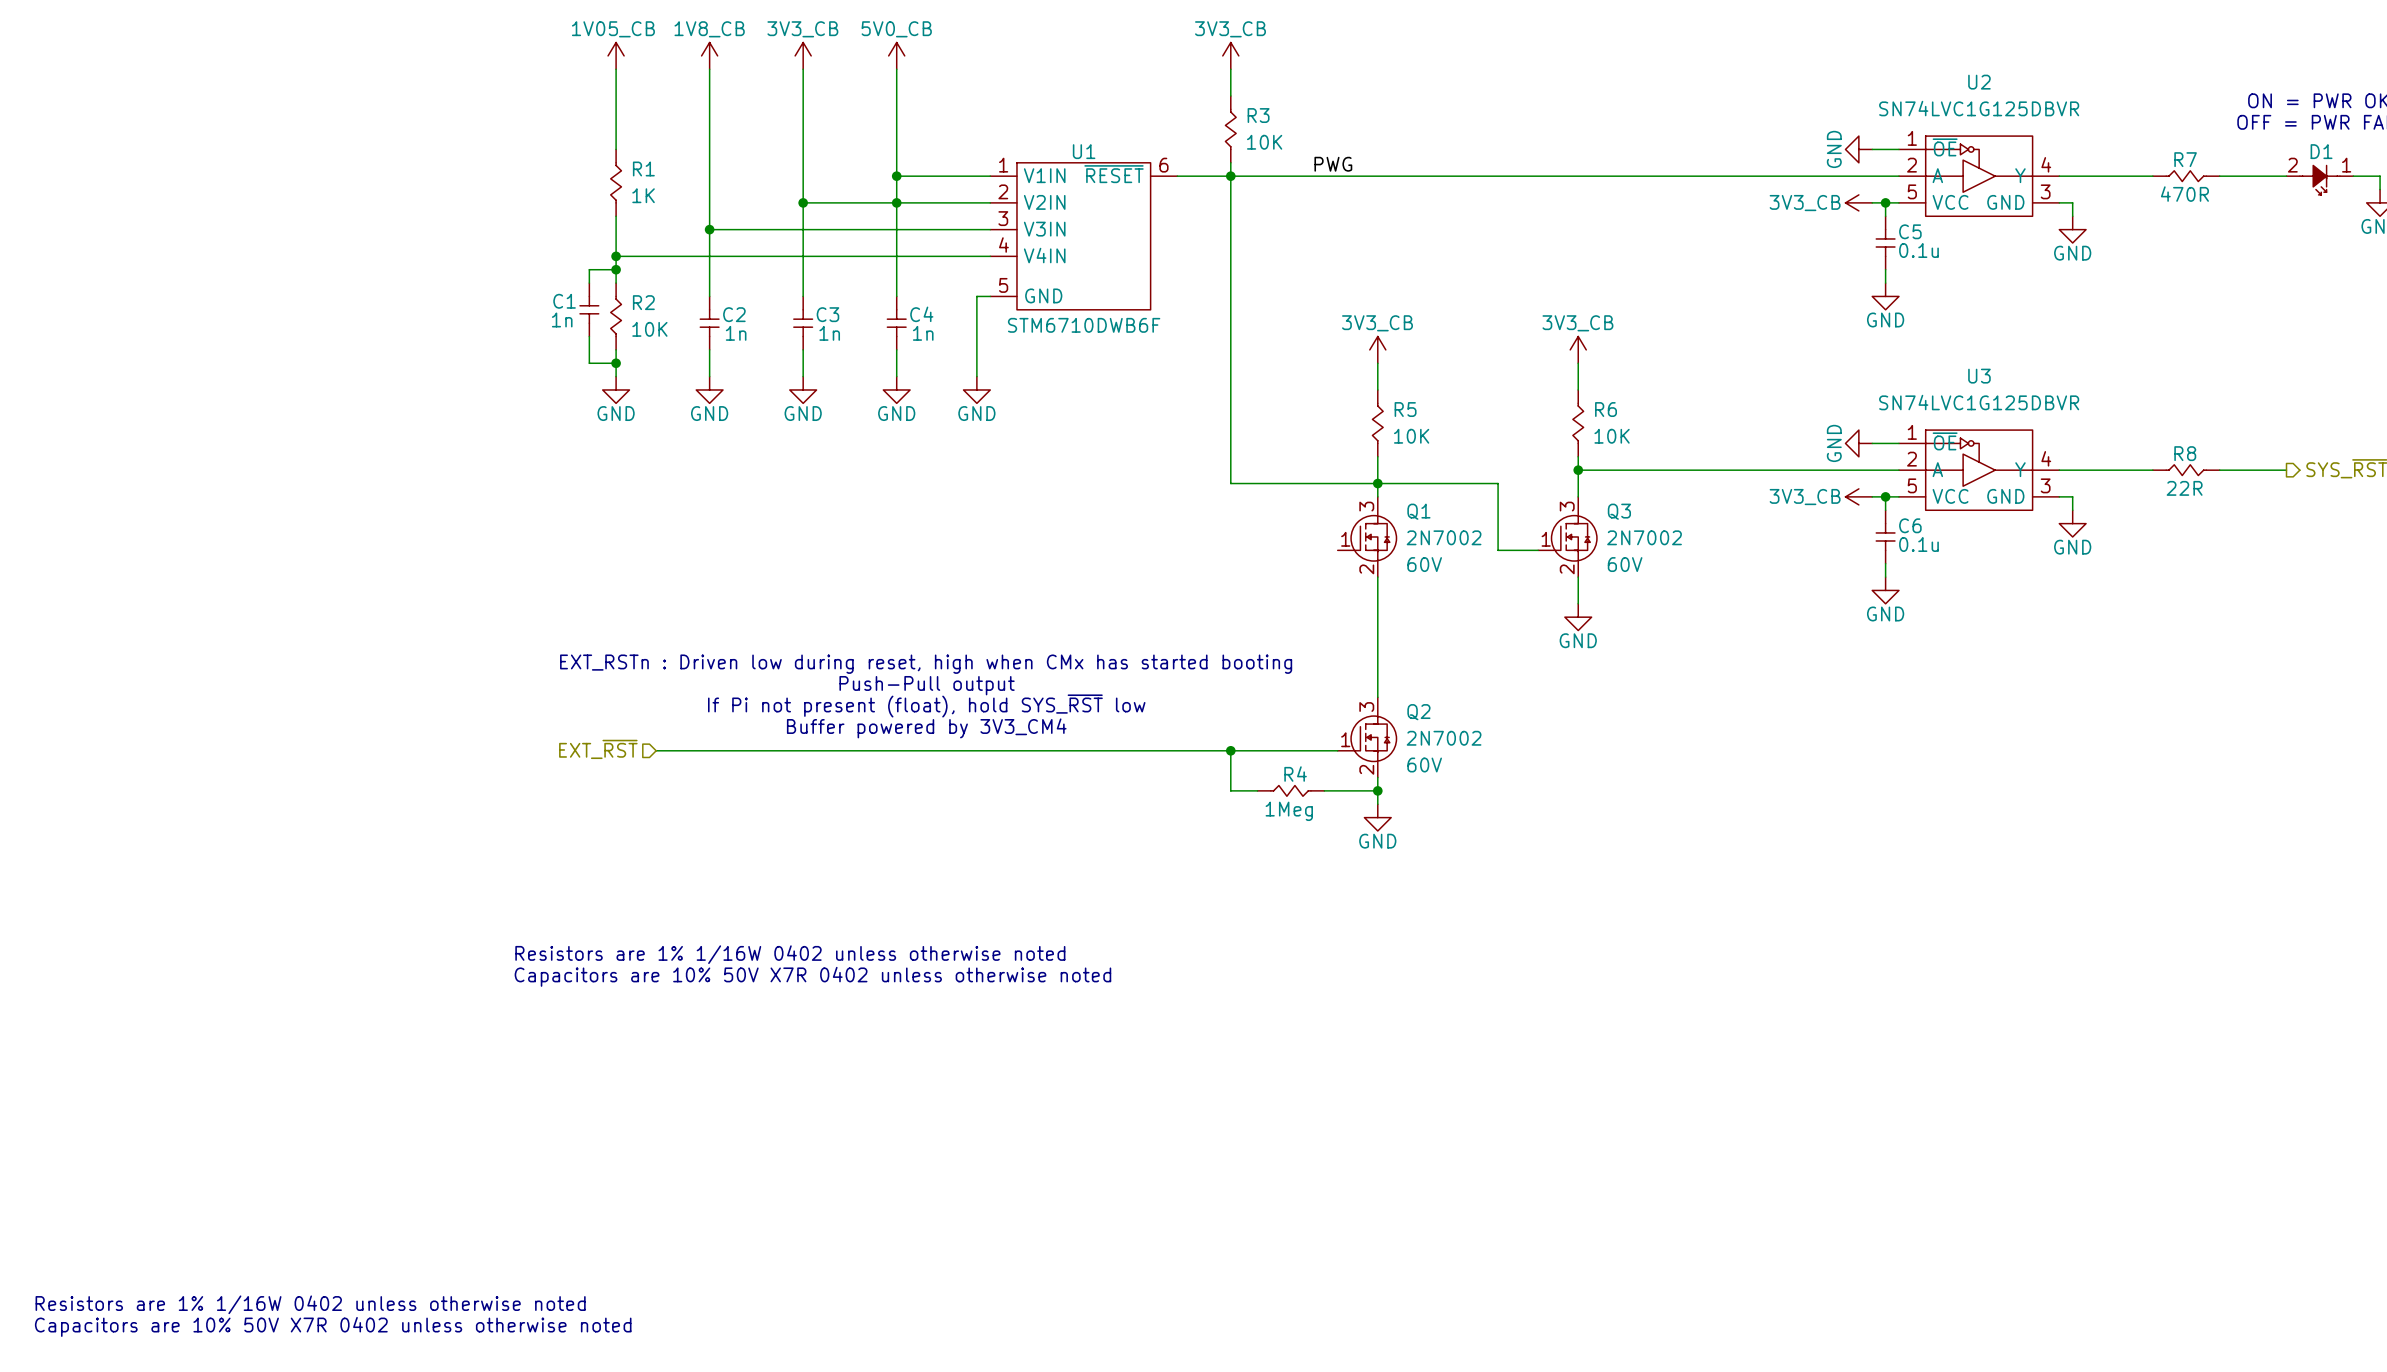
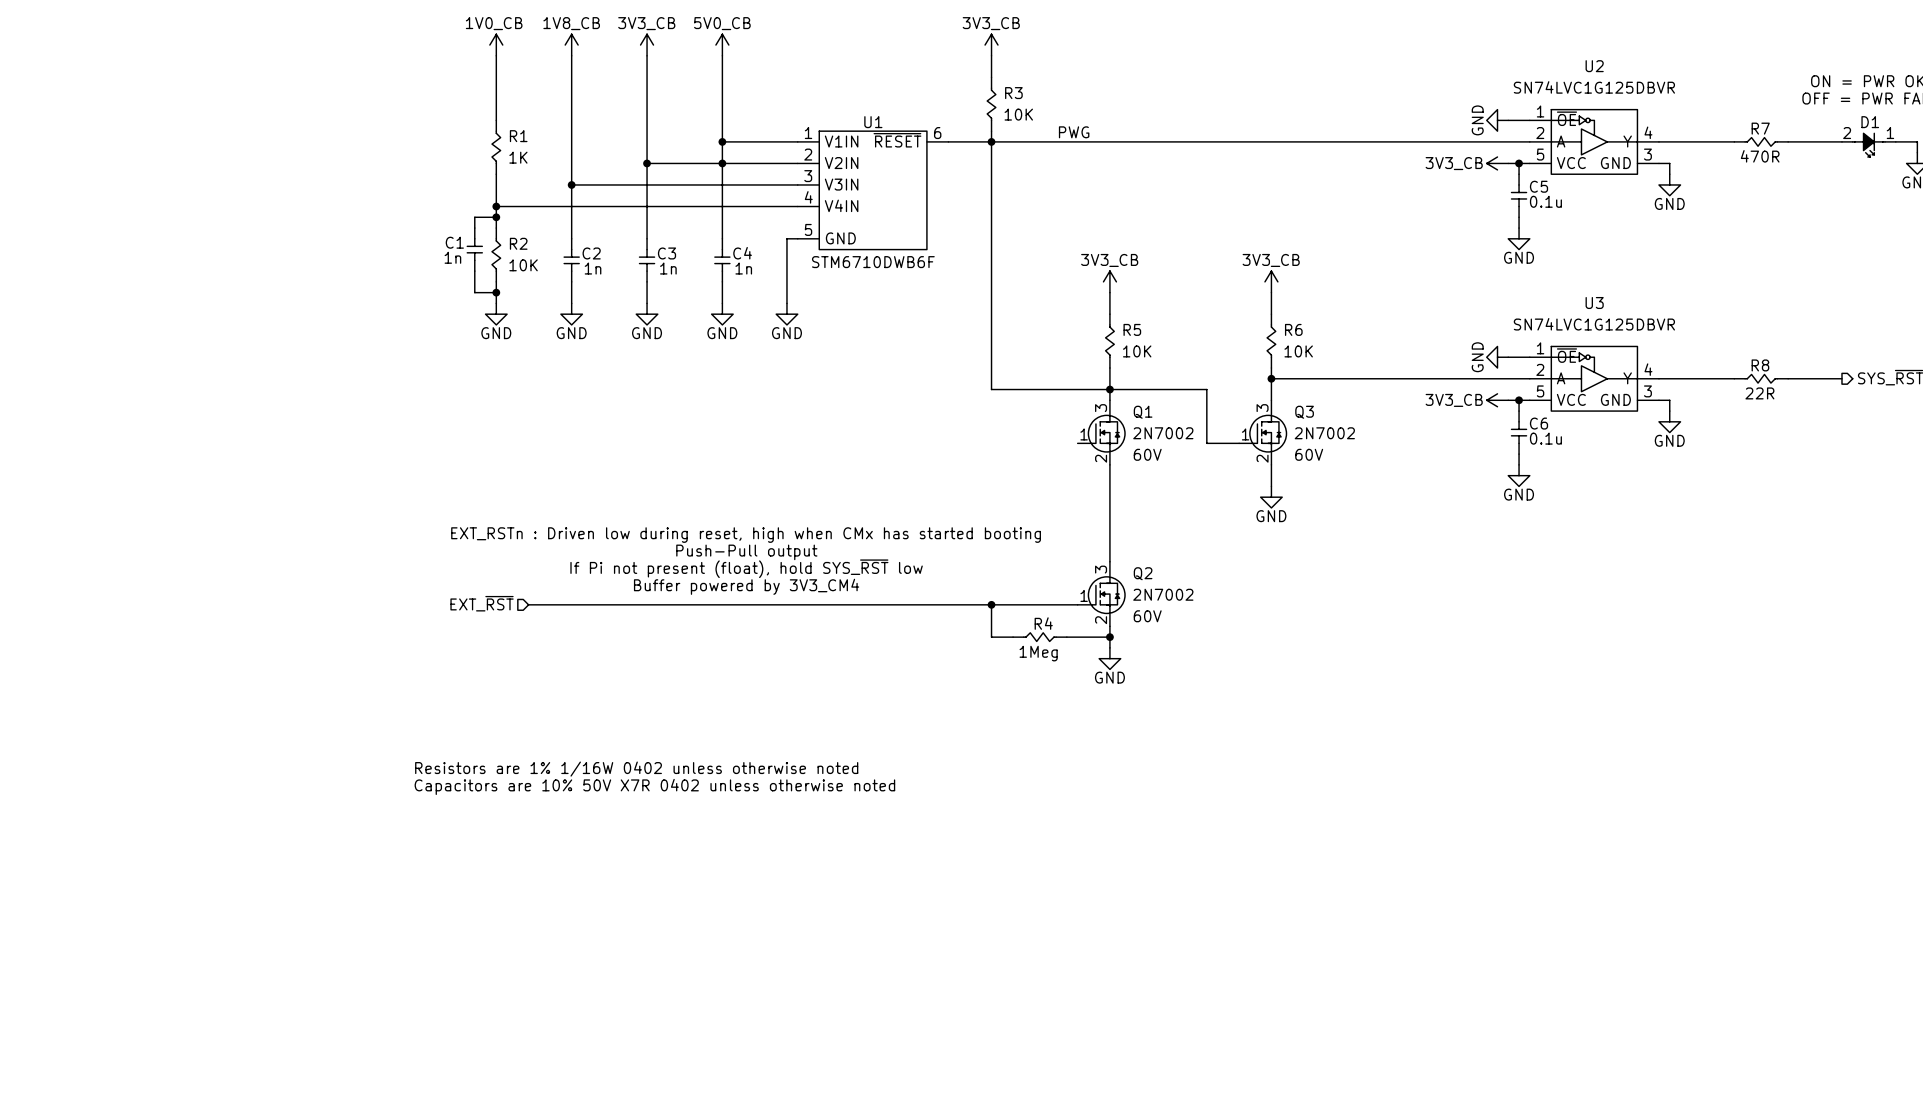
power symbol: 1V05_CB (616, 55) -> 1V0_CB (496, 45)
text: Resistors are 1% 1/16W 0402 unless otherwise noted (310, 1304) -> none
text: Capacitors are 10% 50V X7R 0402 unless otherwise noted (333, 1326) -> none

